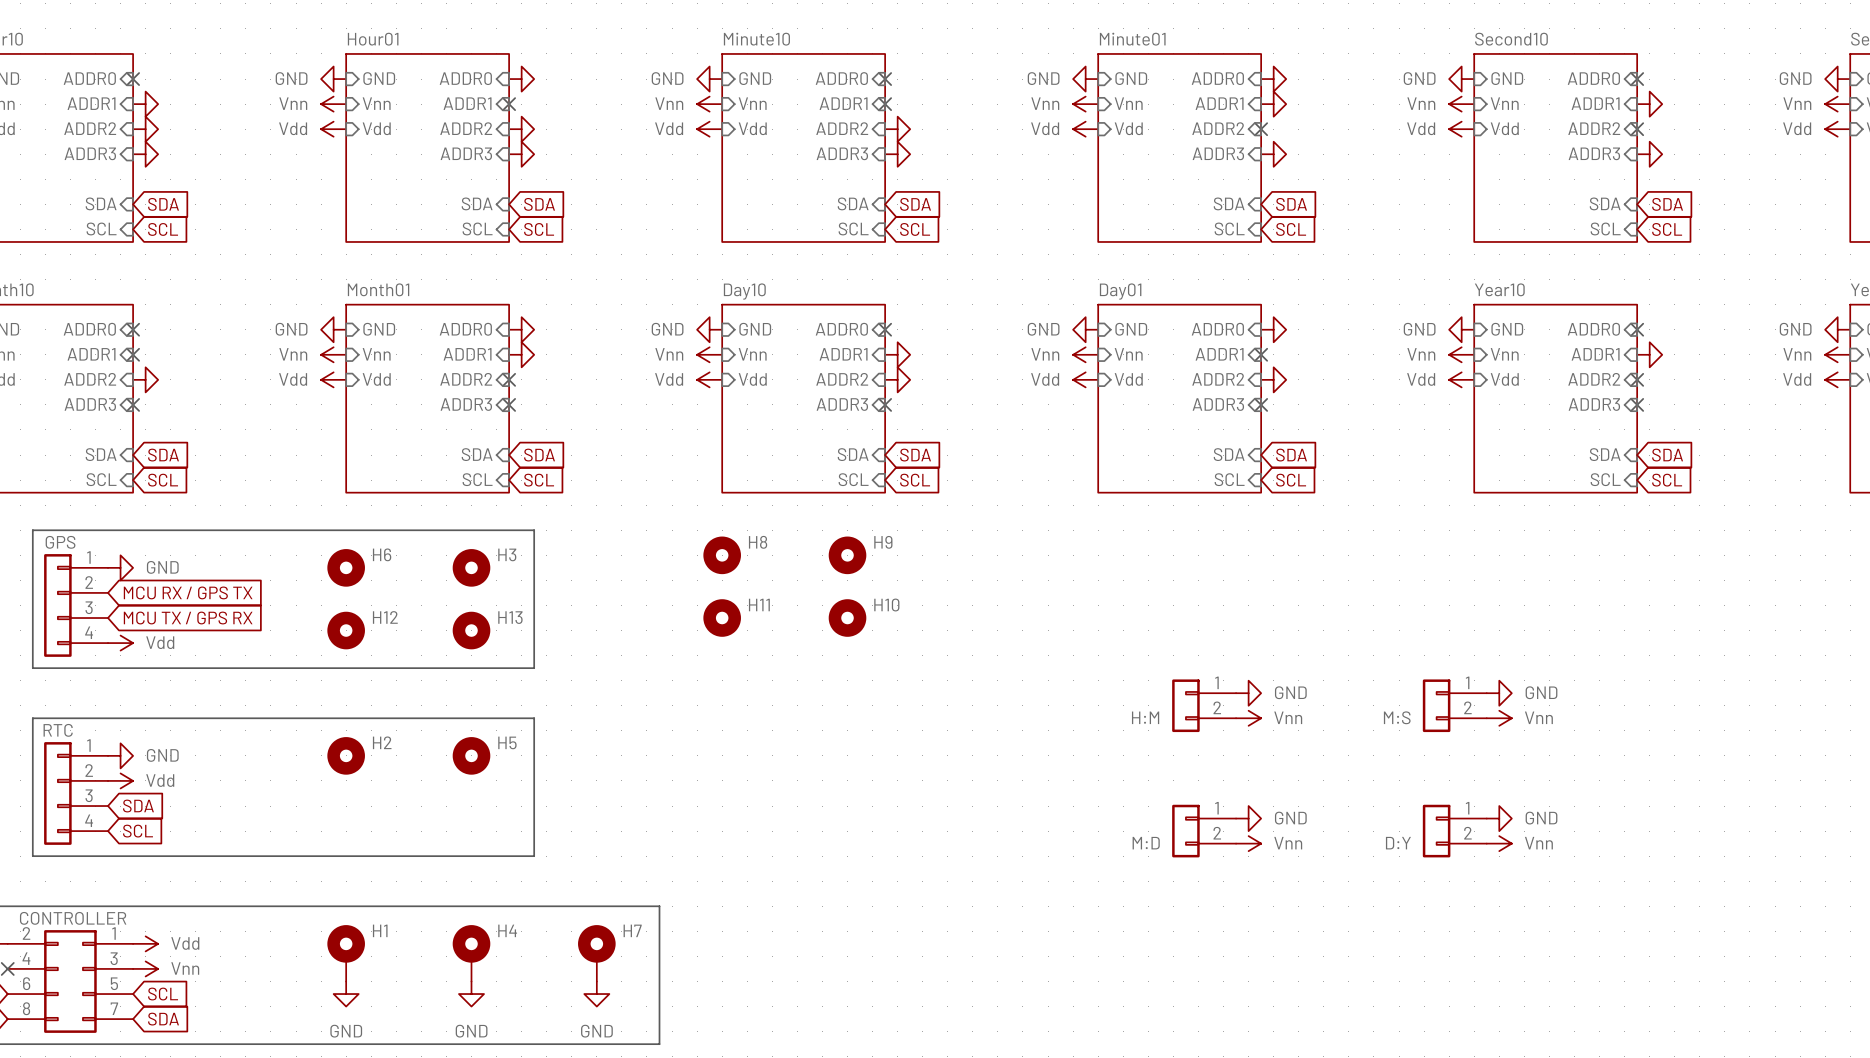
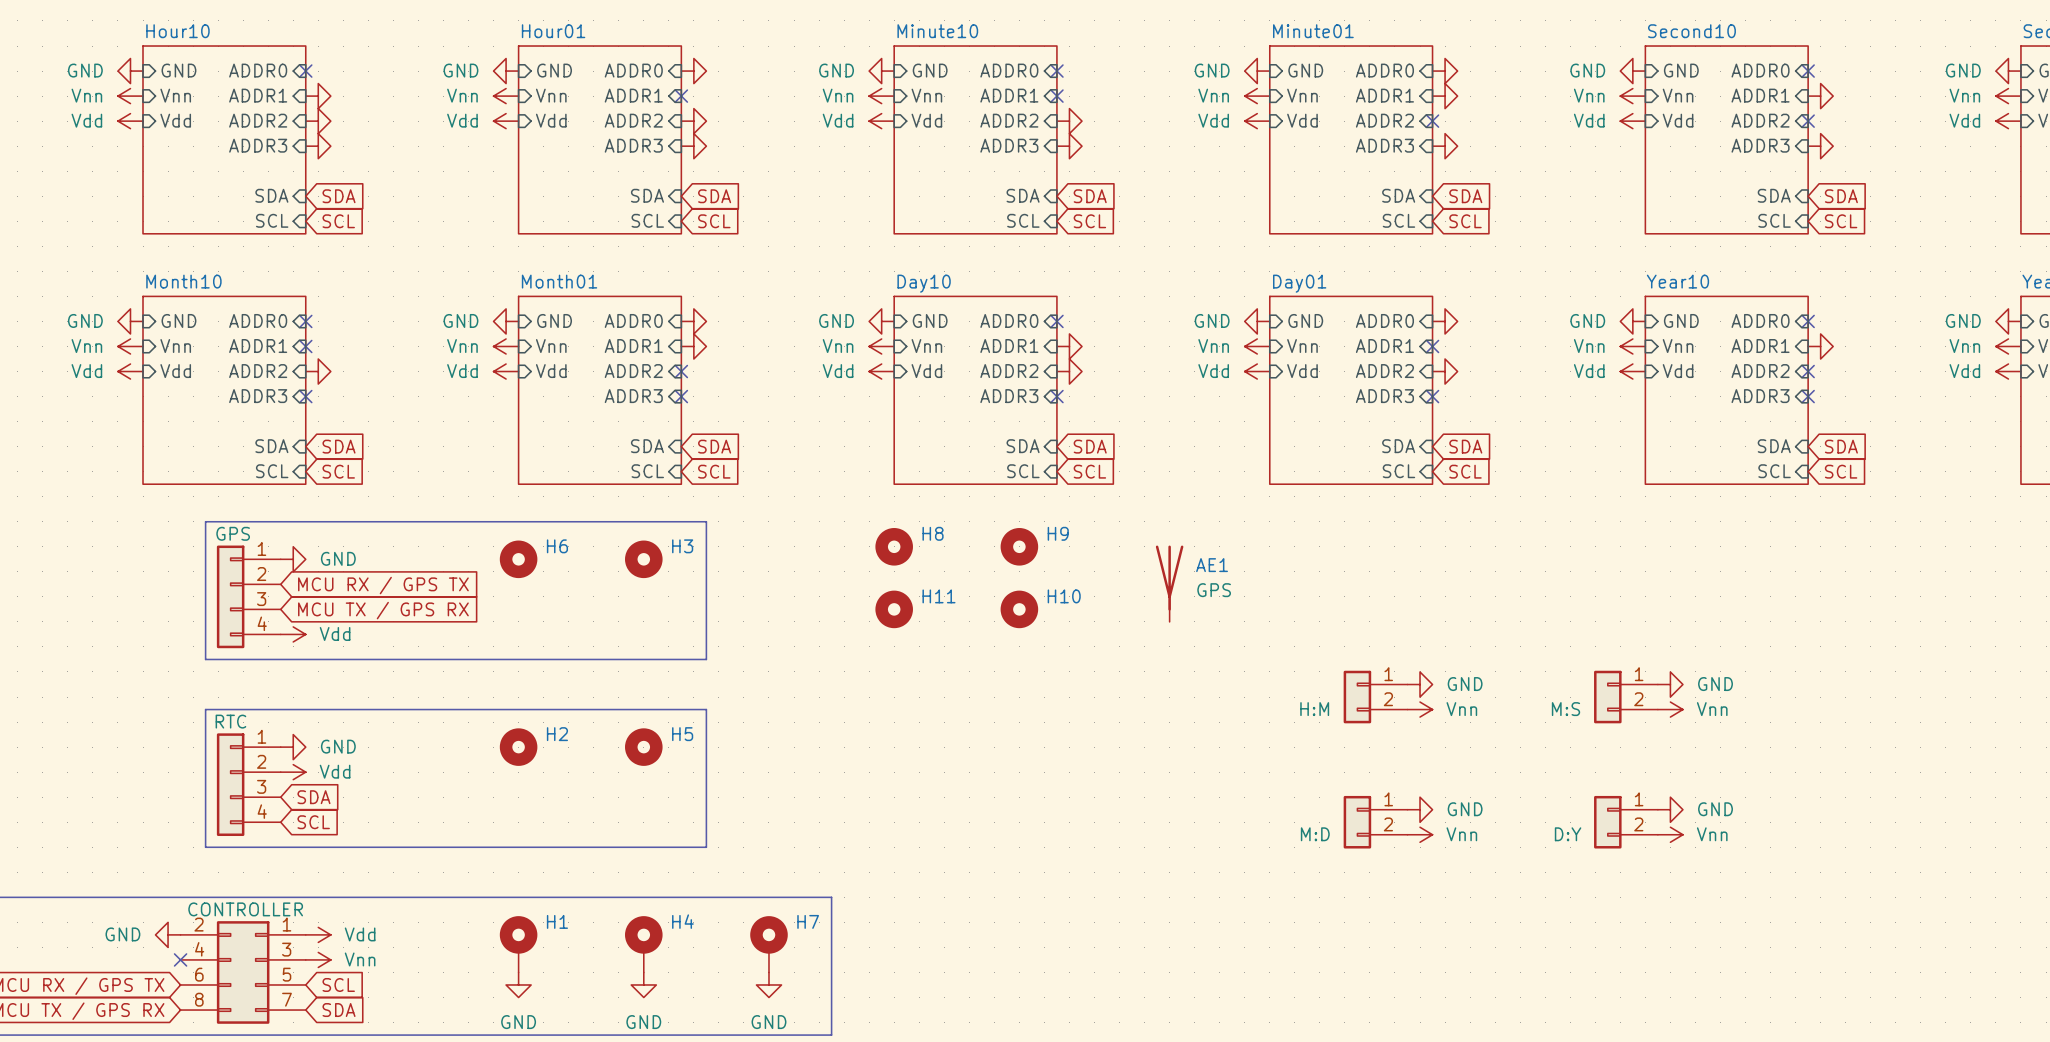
AE1: none -> GPS (1169, 583)
H12: (346, 630) -> none
H13: (471, 630) -> none

